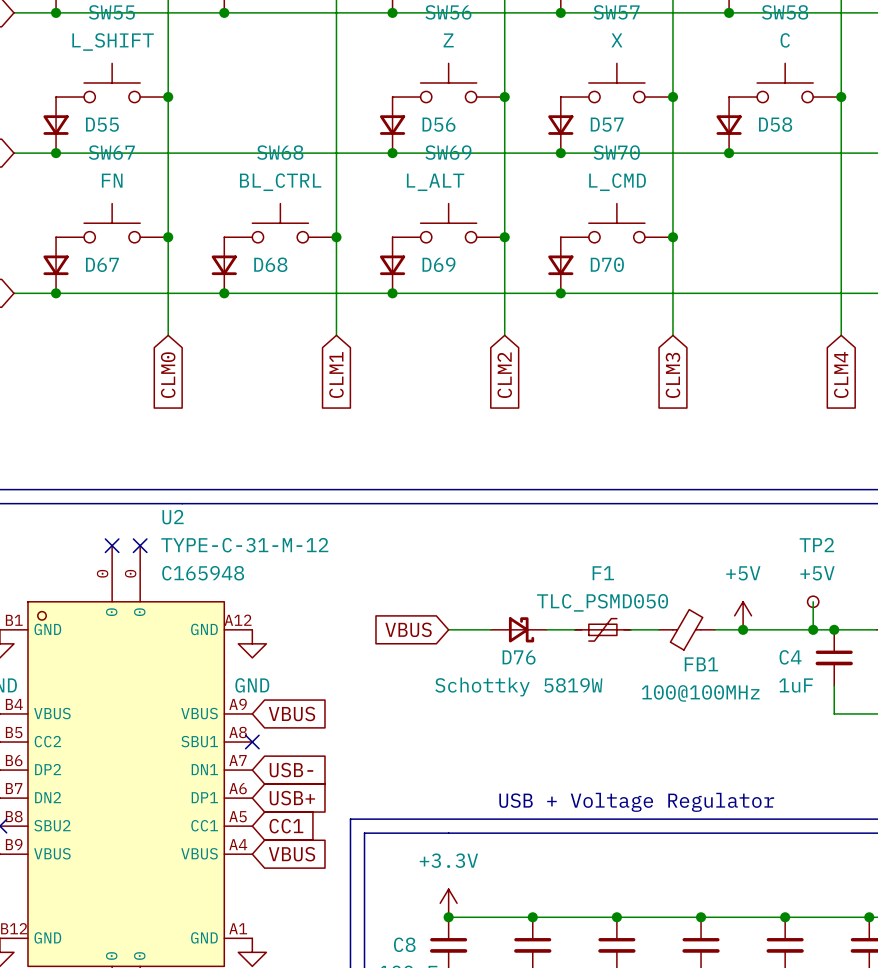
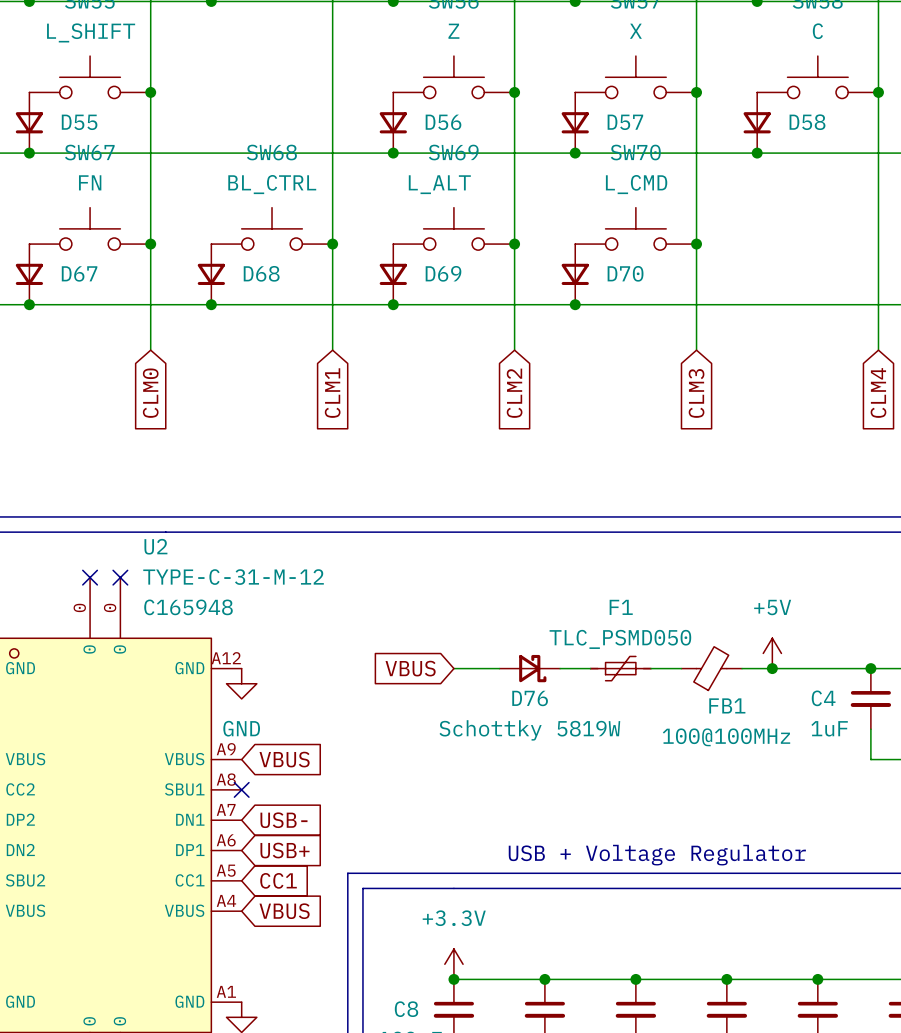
wire: (813, 601) (813, 629) -> none
TP2: +5V (813, 601) -> none
junction: (813, 629) -> none

